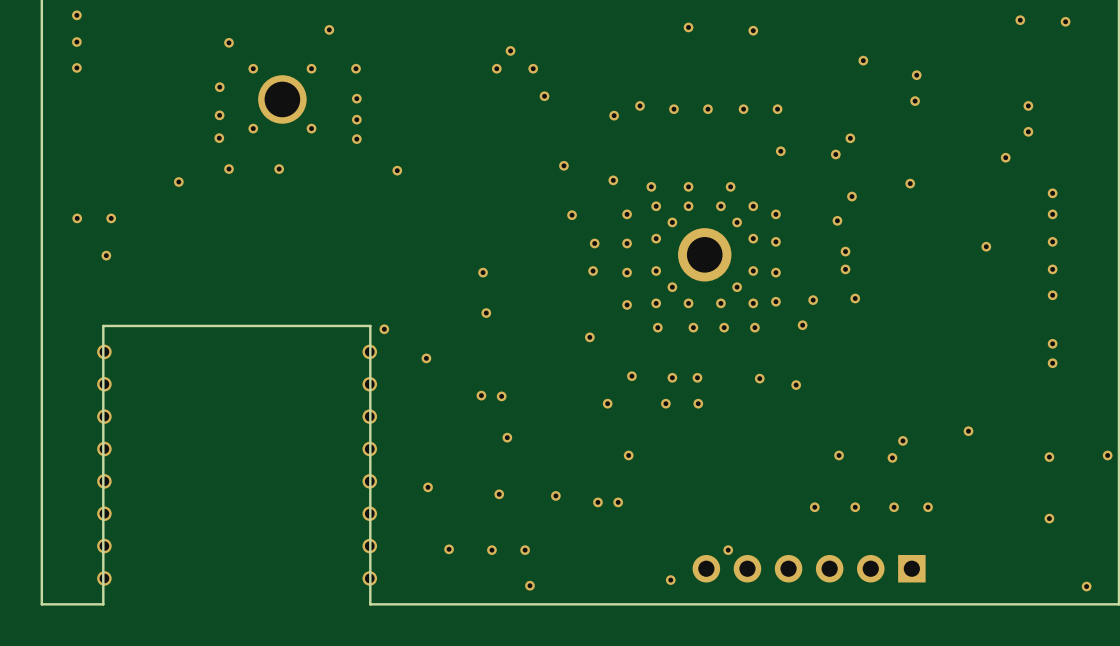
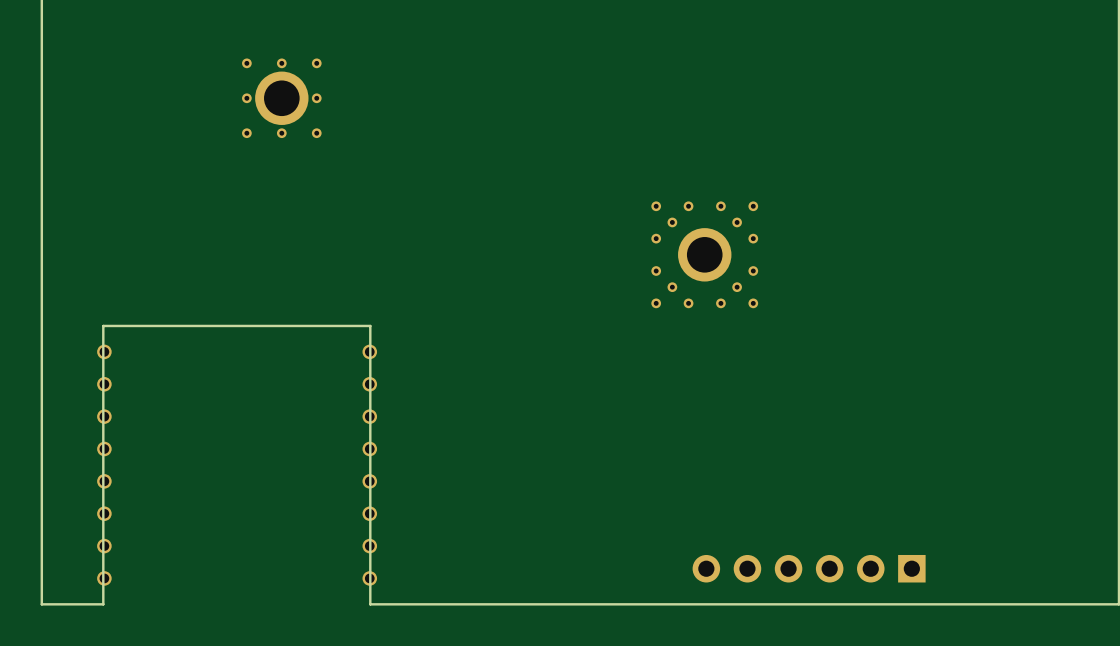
part: (76, 15) -> none
part: (1020, 20) -> none
part: (1065, 21) -> none
part: (688, 27) -> none
part: (329, 29) -> none
part: (753, 30) -> none
part: (76, 42) -> none
part: (228, 42) -> none
part: (510, 50) -> none
part: (863, 60) -> none
part: (76, 67) -> none
part: (253, 68) -> none
part: (311, 68) -> none
part: (356, 68) -> none
part: (496, 68) -> none
part: (533, 68) -> none
part footprint: [258, 75, 307, 124] -> [242, 58, 322, 139]
part: (916, 75) -> none
part: (219, 87) -> none
part: (544, 96) -> none
part: (356, 98) -> none
part: (915, 101) -> none
part: (640, 105) -> none
part: (1028, 105) -> none
part: (673, 109) -> none
part: (707, 109) -> none
part: (743, 109) -> none
part: (777, 109) -> none
part: (219, 115) -> none
part: (614, 115) -> none
part: (356, 119) -> none
part: (253, 128) -> none
part: (311, 128) -> none
part: (1028, 131) -> none
part: (219, 138) -> none
part: (850, 138) -> none
part: (356, 139) -> none
part: (780, 151) -> none
part: (835, 154) -> none
part: (1005, 157) -> none
part: (563, 165) -> none
part: (228, 169) -> none
part: (279, 169) -> none
part: (397, 170) -> none
part: (613, 180) -> none
part: (178, 181) -> none
part: (910, 183) -> none
part: (651, 186) -> none
part: (688, 186) -> none
part: (730, 186) -> none
part: (1052, 193) -> none
part: (851, 196) -> none
part: (627, 214) -> none
part: (775, 214) -> none
part: (1052, 214) -> none
part: (572, 215) -> none
part: (77, 218) -> none
part: (111, 218) -> none
part: (837, 220) -> none
part: (775, 241) -> none
part: (1052, 241) -> none
part: (594, 243) -> none
part: (627, 243) -> none
part: (986, 246) -> none
part: (845, 251) -> none
part: (106, 255) -> none
part: (845, 269) -> none
part: (1052, 269) -> none
part: (593, 270) -> none
part: (483, 272) -> none
part: (627, 272) -> none
part: (775, 272) -> none
part: (1052, 295) -> none
part: (855, 298) -> none
part: (813, 300) -> none
part: (775, 301) -> none
part: (627, 304) -> none
part: (486, 313) -> none
part: (802, 325) -> none
part: (657, 327) -> none
part: (693, 327) -> none
part: (724, 327) -> none
part: (754, 327) -> none
part: (384, 329) -> none
part: (589, 337) -> none
part: (1052, 343) -> none
part: (426, 358) -> none
part: (1052, 363) -> none
part: (631, 376) -> none
part: (672, 377) -> none
part: (697, 377) -> none
part: (759, 378) -> none
part: (796, 385) -> none
part: (481, 395) -> none
part: (501, 396) -> none
part: (607, 403) -> none
part: (665, 403) -> none
part: (698, 403) -> none
part: (968, 431) -> none
part: (507, 437) -> none
part: (902, 440) -> none
part: (628, 455) -> none
part: (839, 455) -> none
part: (1107, 455) -> none
part: (892, 457) -> none
part: (1049, 457) -> none
part: (428, 487) -> none
part: (499, 494) -> none
part: (555, 495) -> none
part: (597, 502) -> none
part: (618, 502) -> none
part: (814, 507) -> none
part: (855, 507) -> none
part: (894, 507) -> none
part: (928, 507) -> none
part: (1049, 518) -> none
part: (449, 549) -> none
part: (491, 550) -> none
part: (525, 550) -> none
part: (728, 550) -> none
part: (670, 580) -> none
part: (529, 585) -> none
part: (1086, 586) -> none

